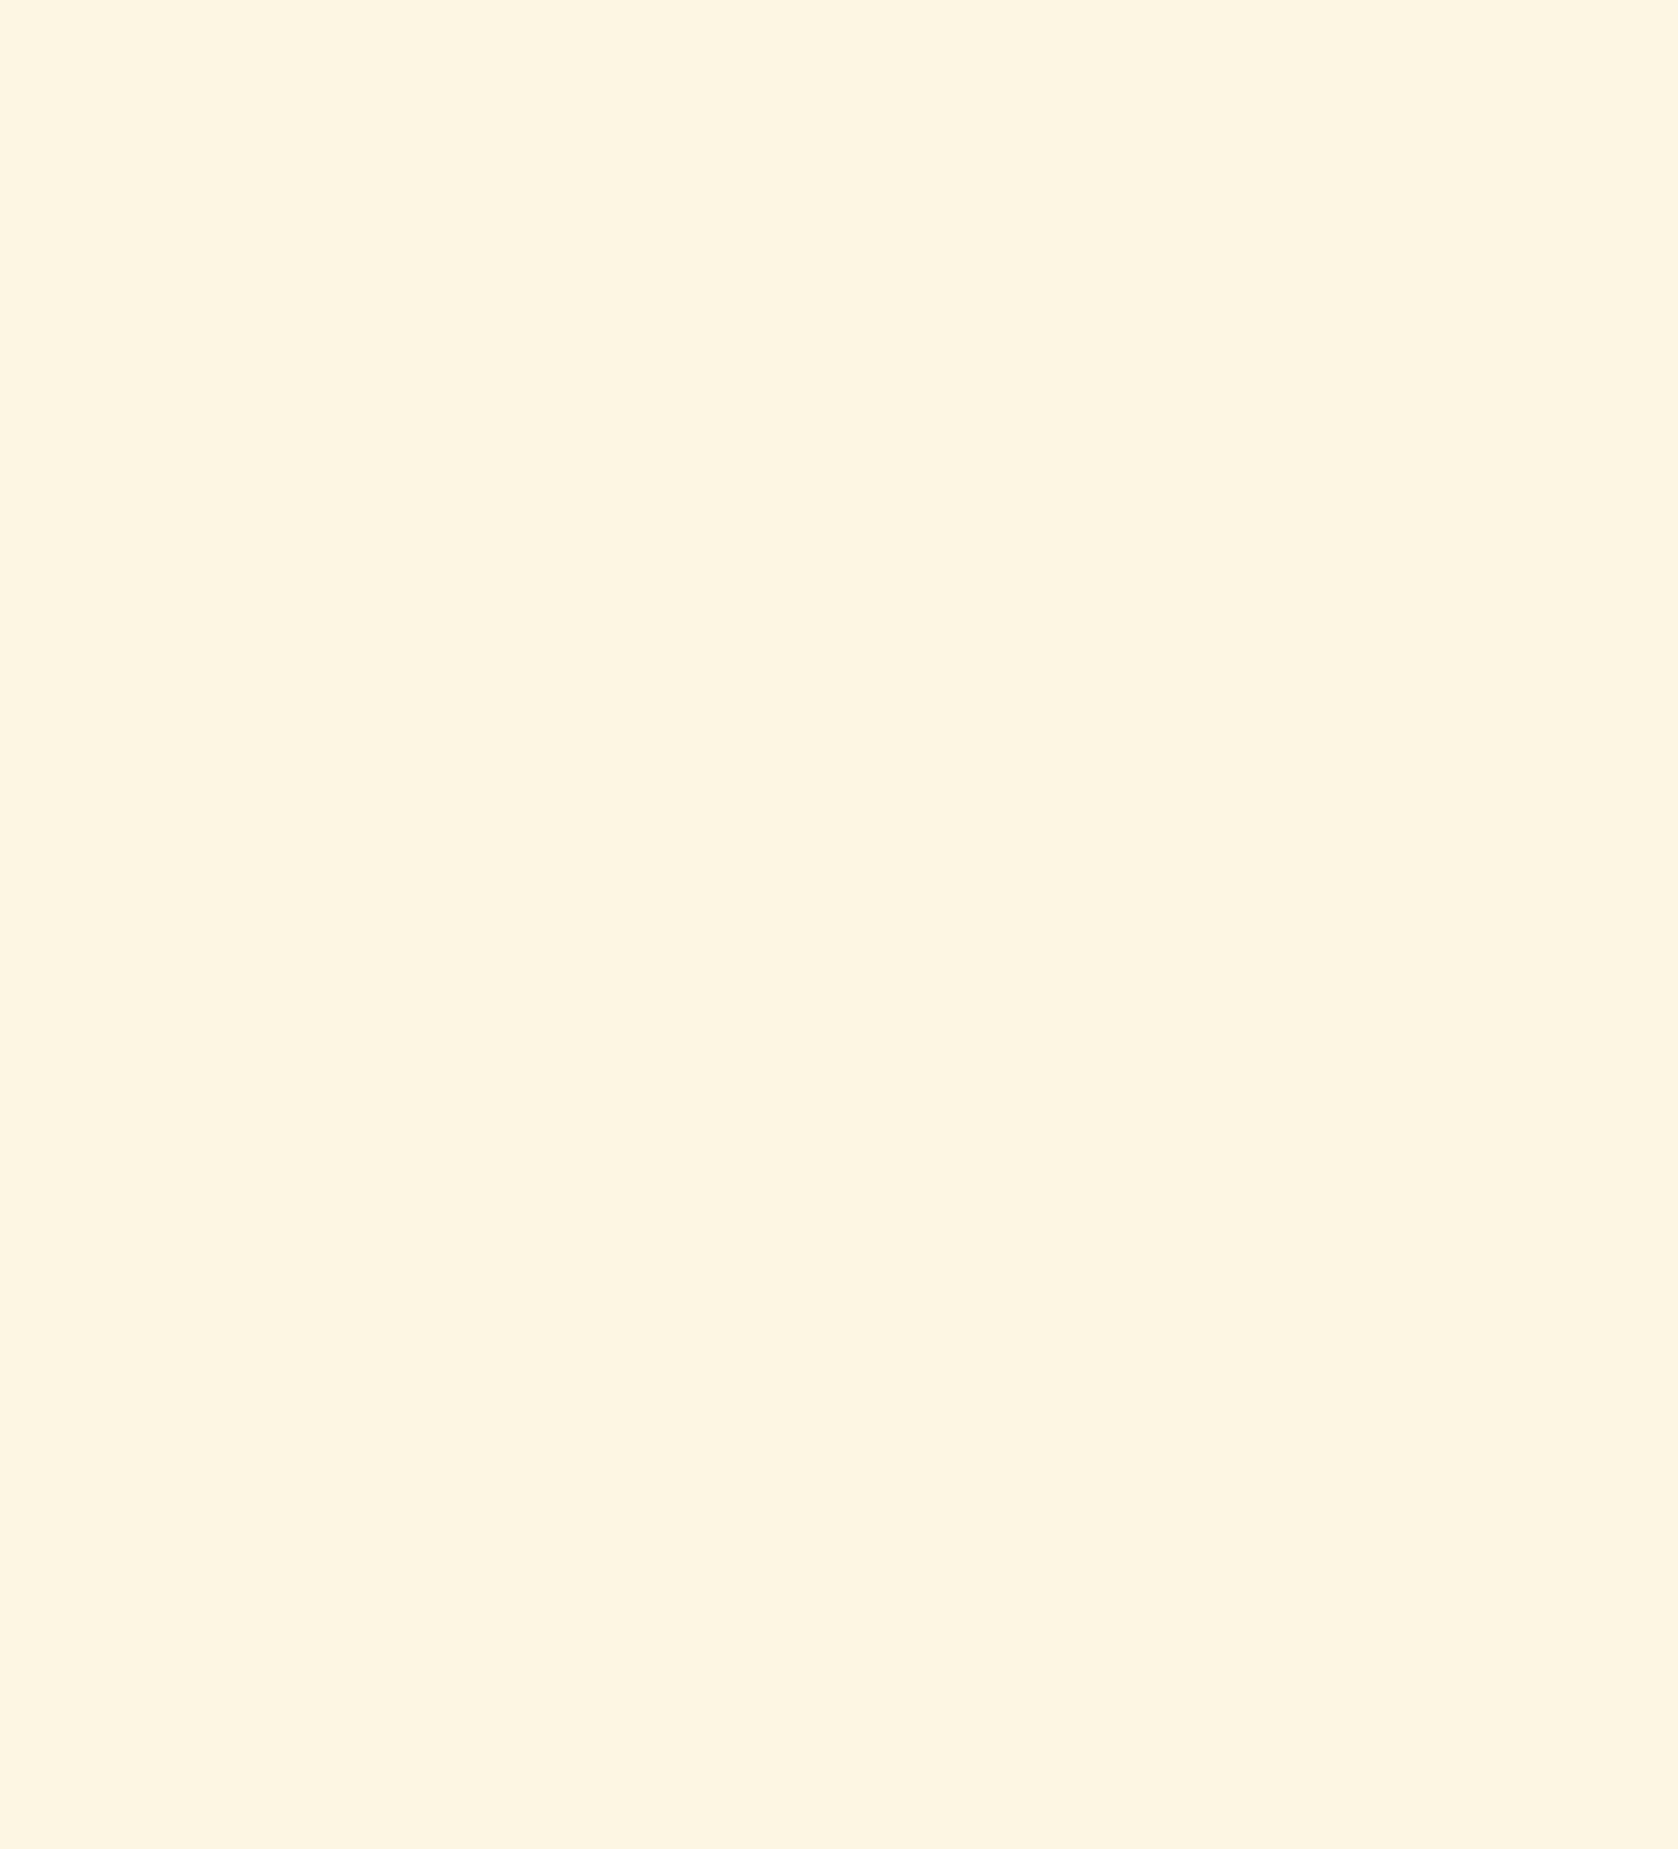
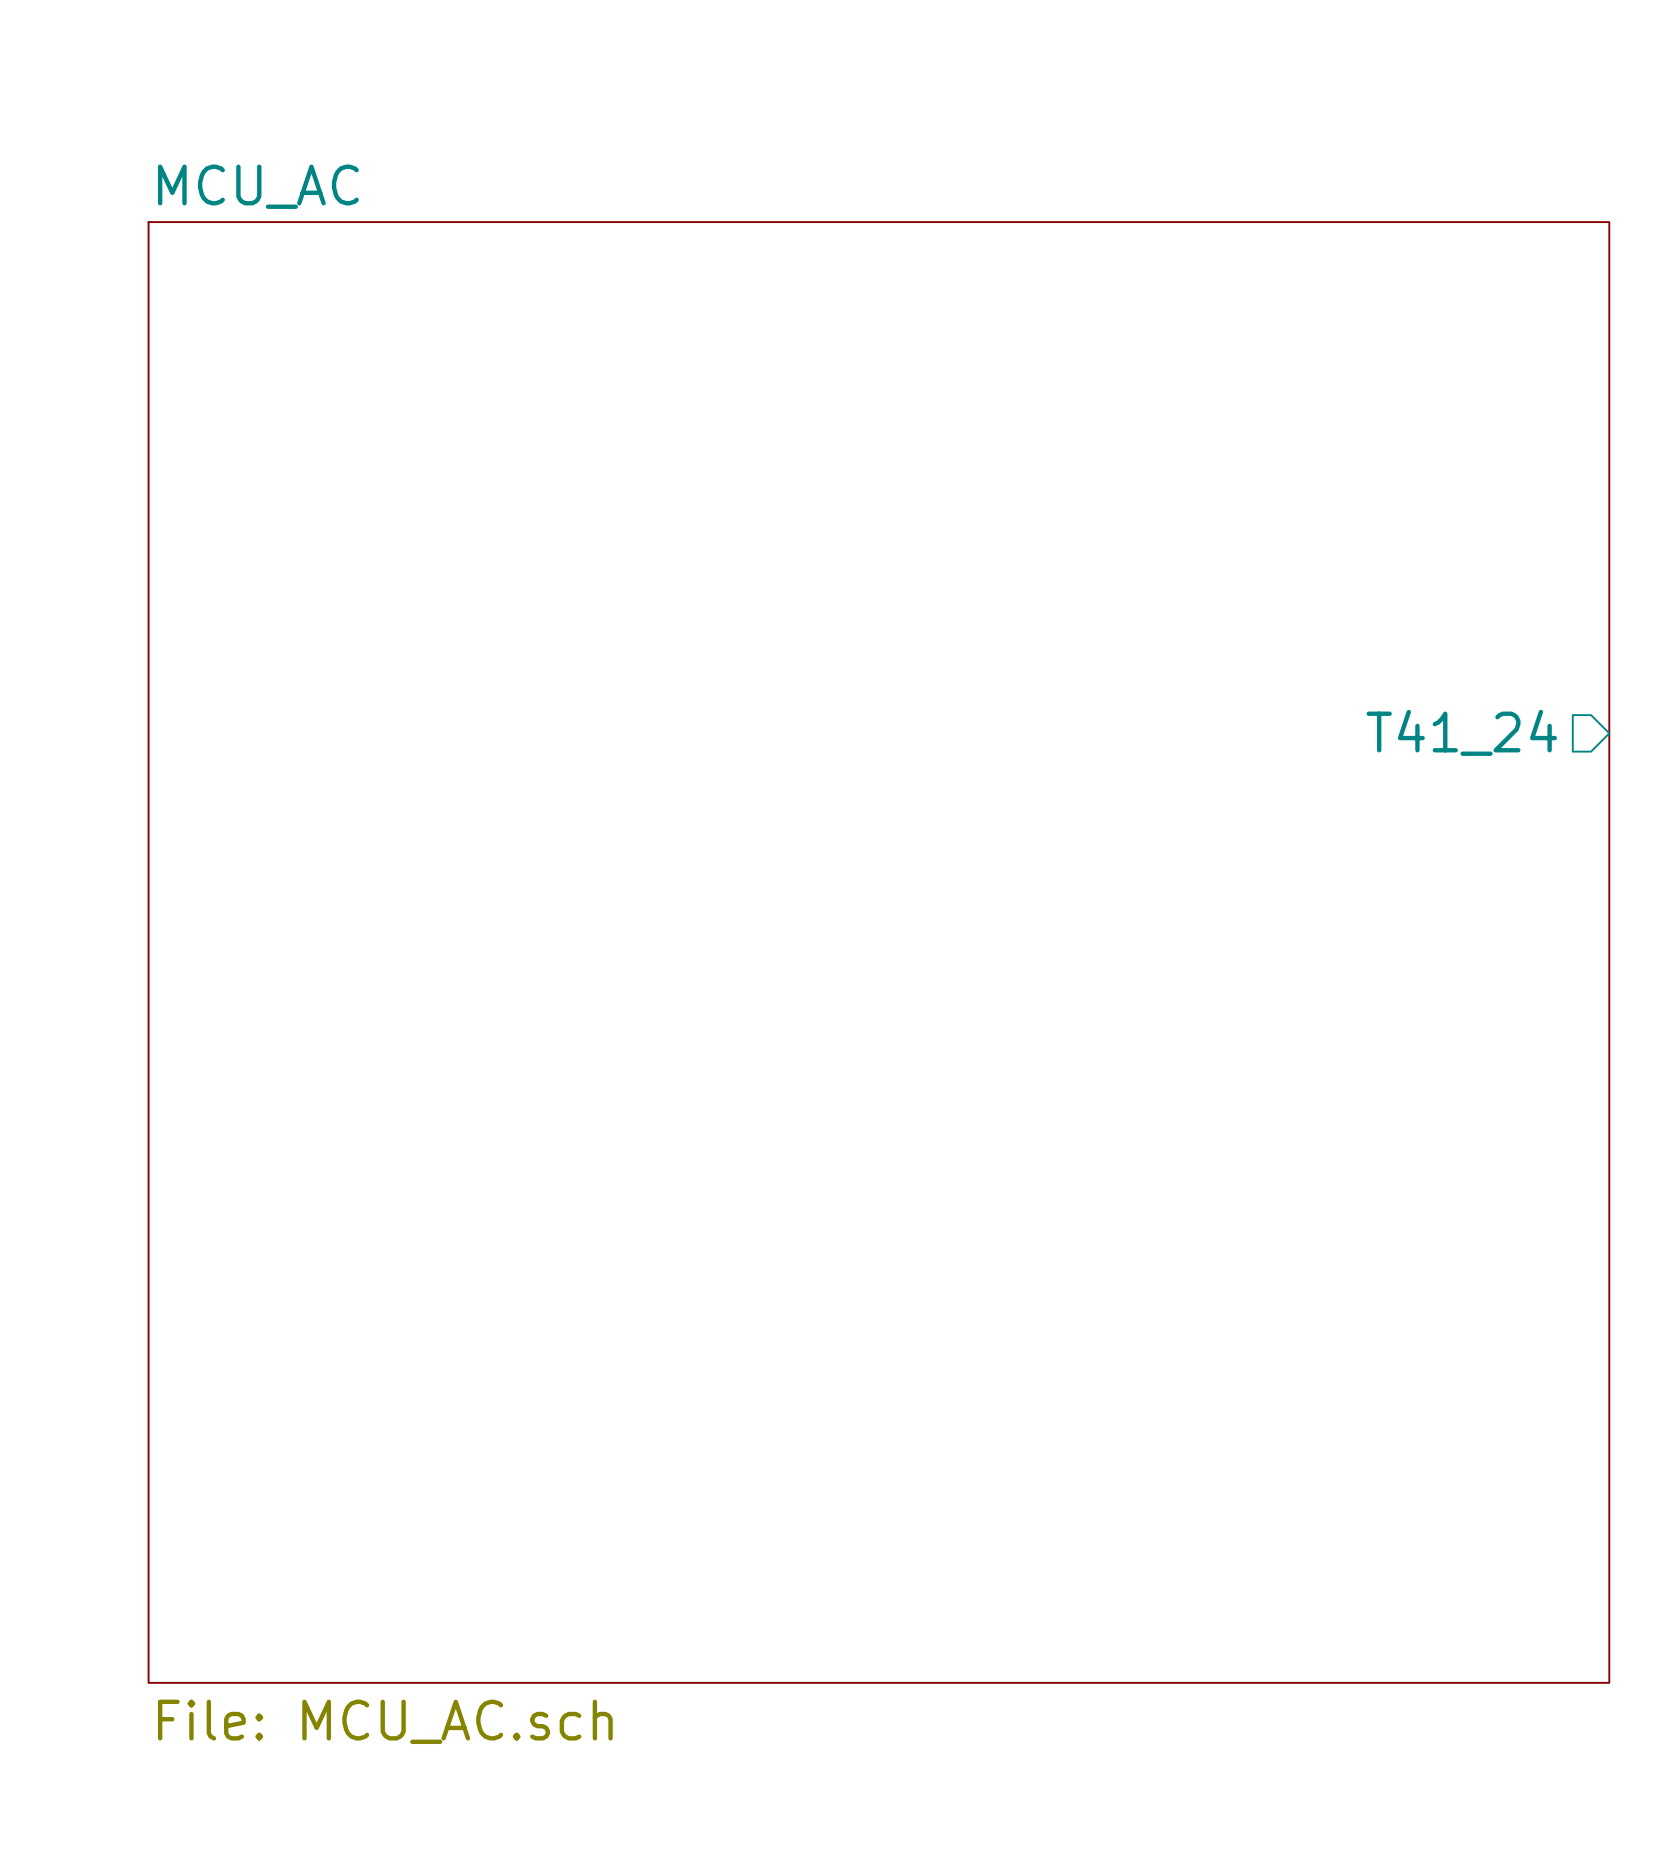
sheet pin: none -> T41_24 (1461, 732)
sheet MCU_AC: none -> File: MCU_AC.sch (878, 952)

